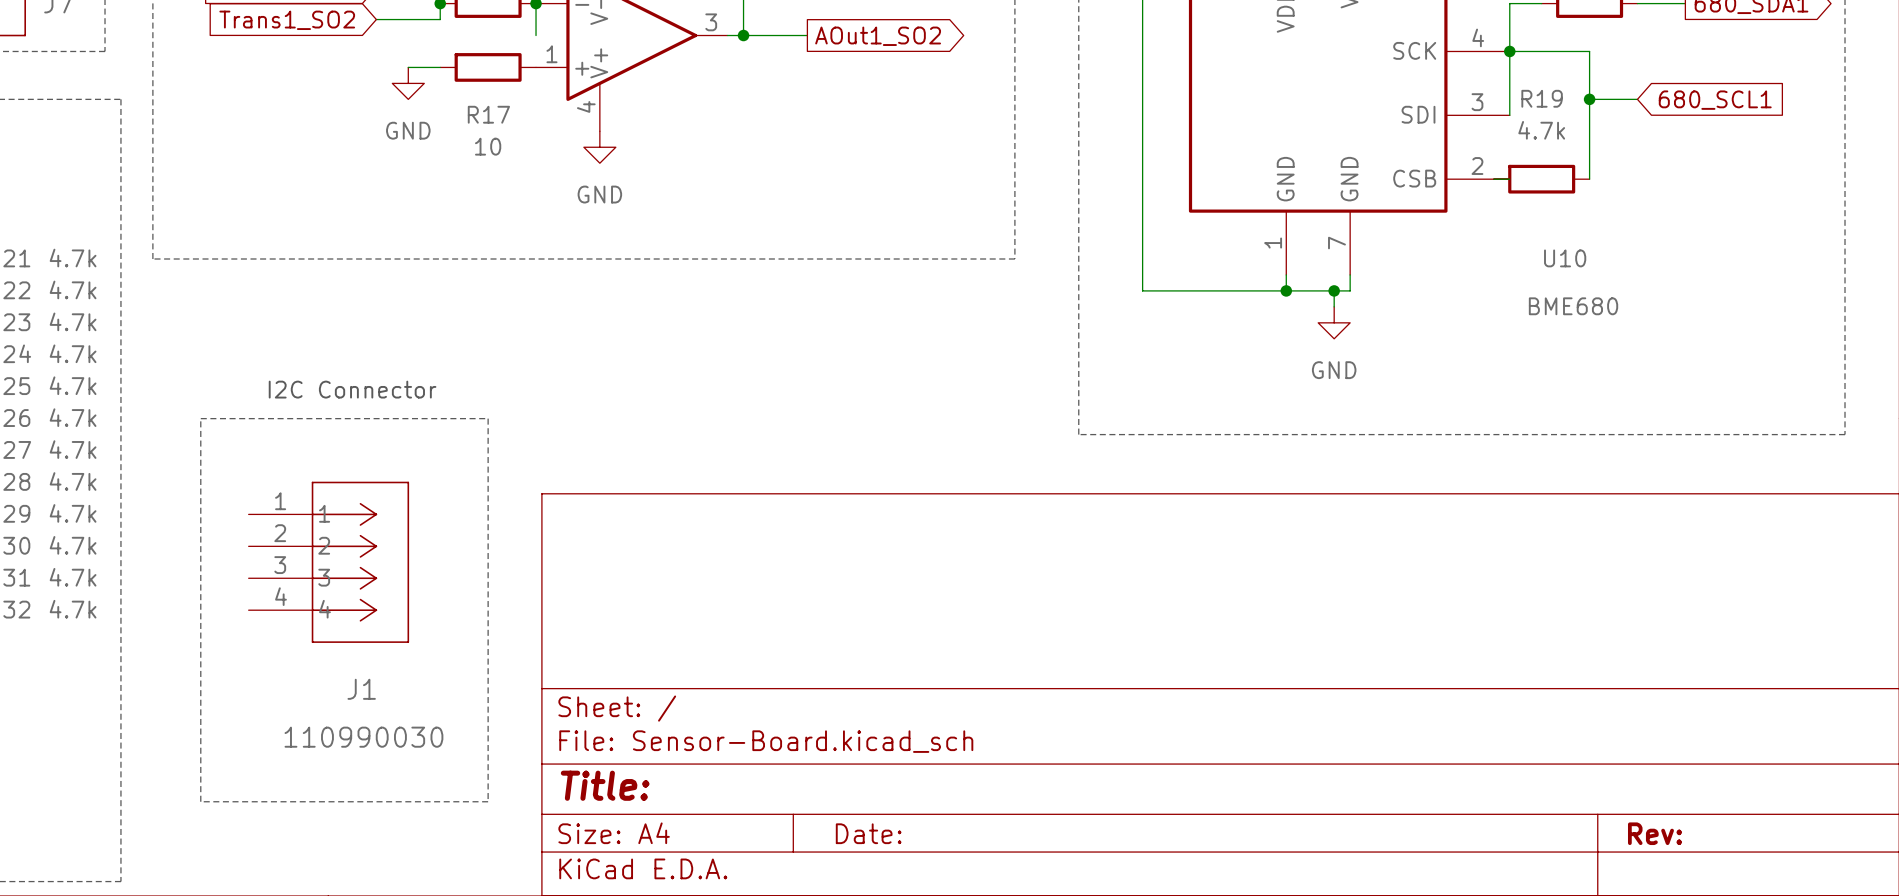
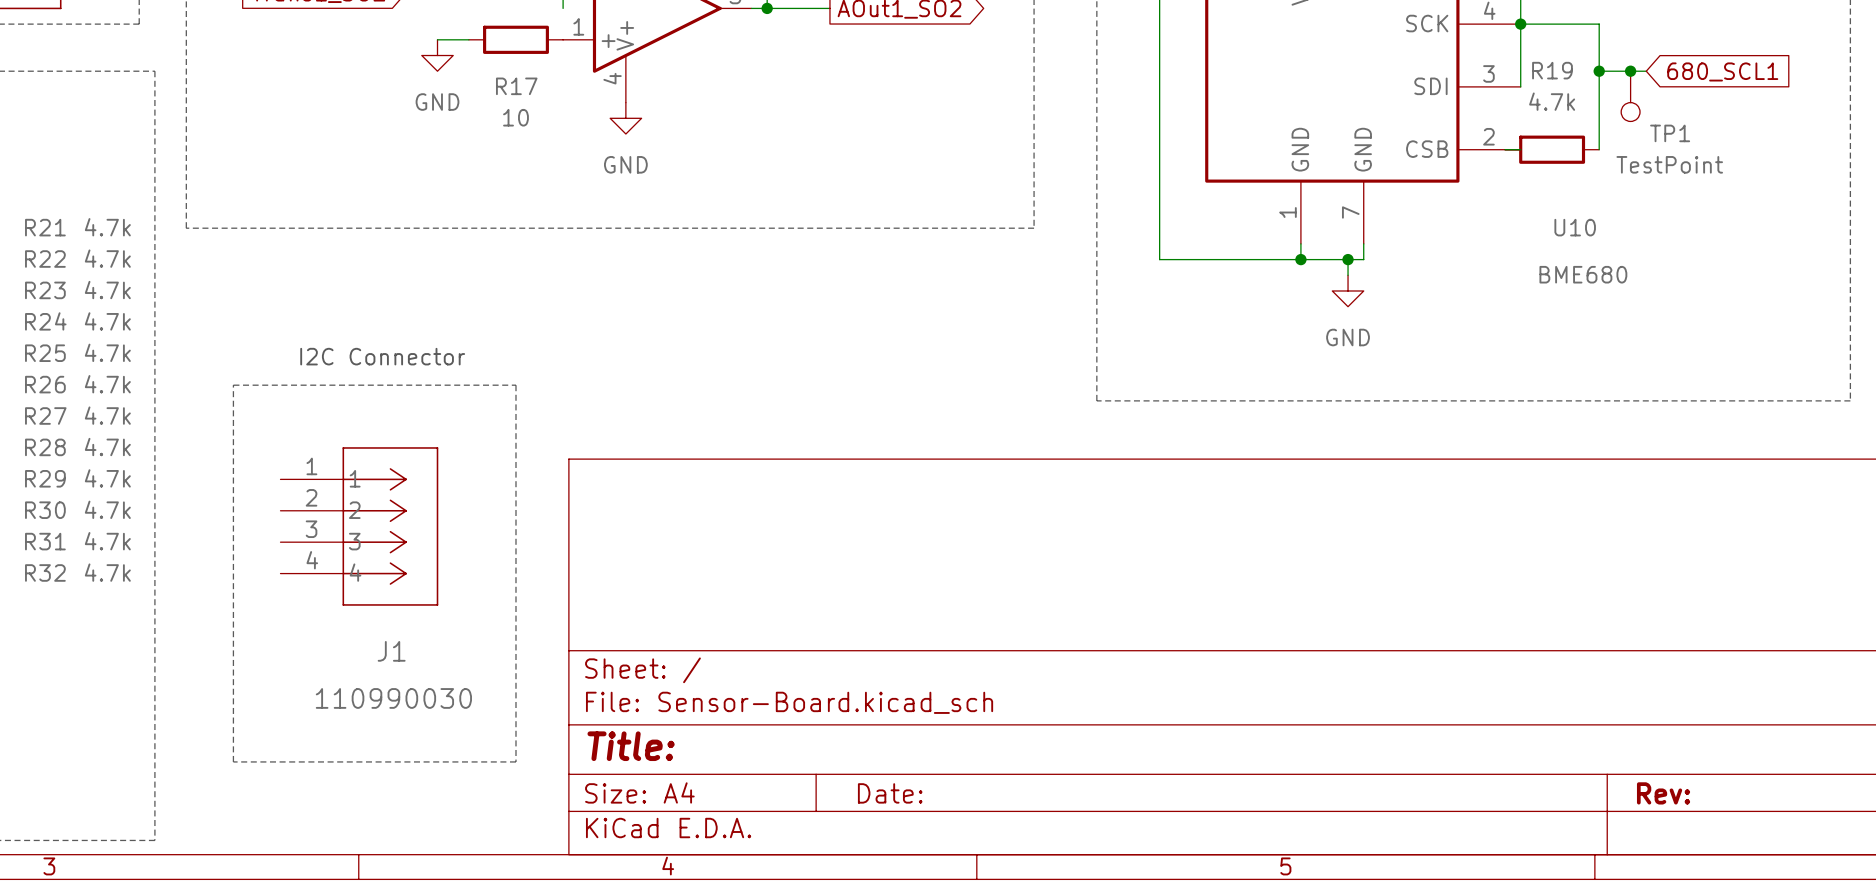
junction: none -> (1630, 71)
TP1: none -> TestPoint (1630, 96)

